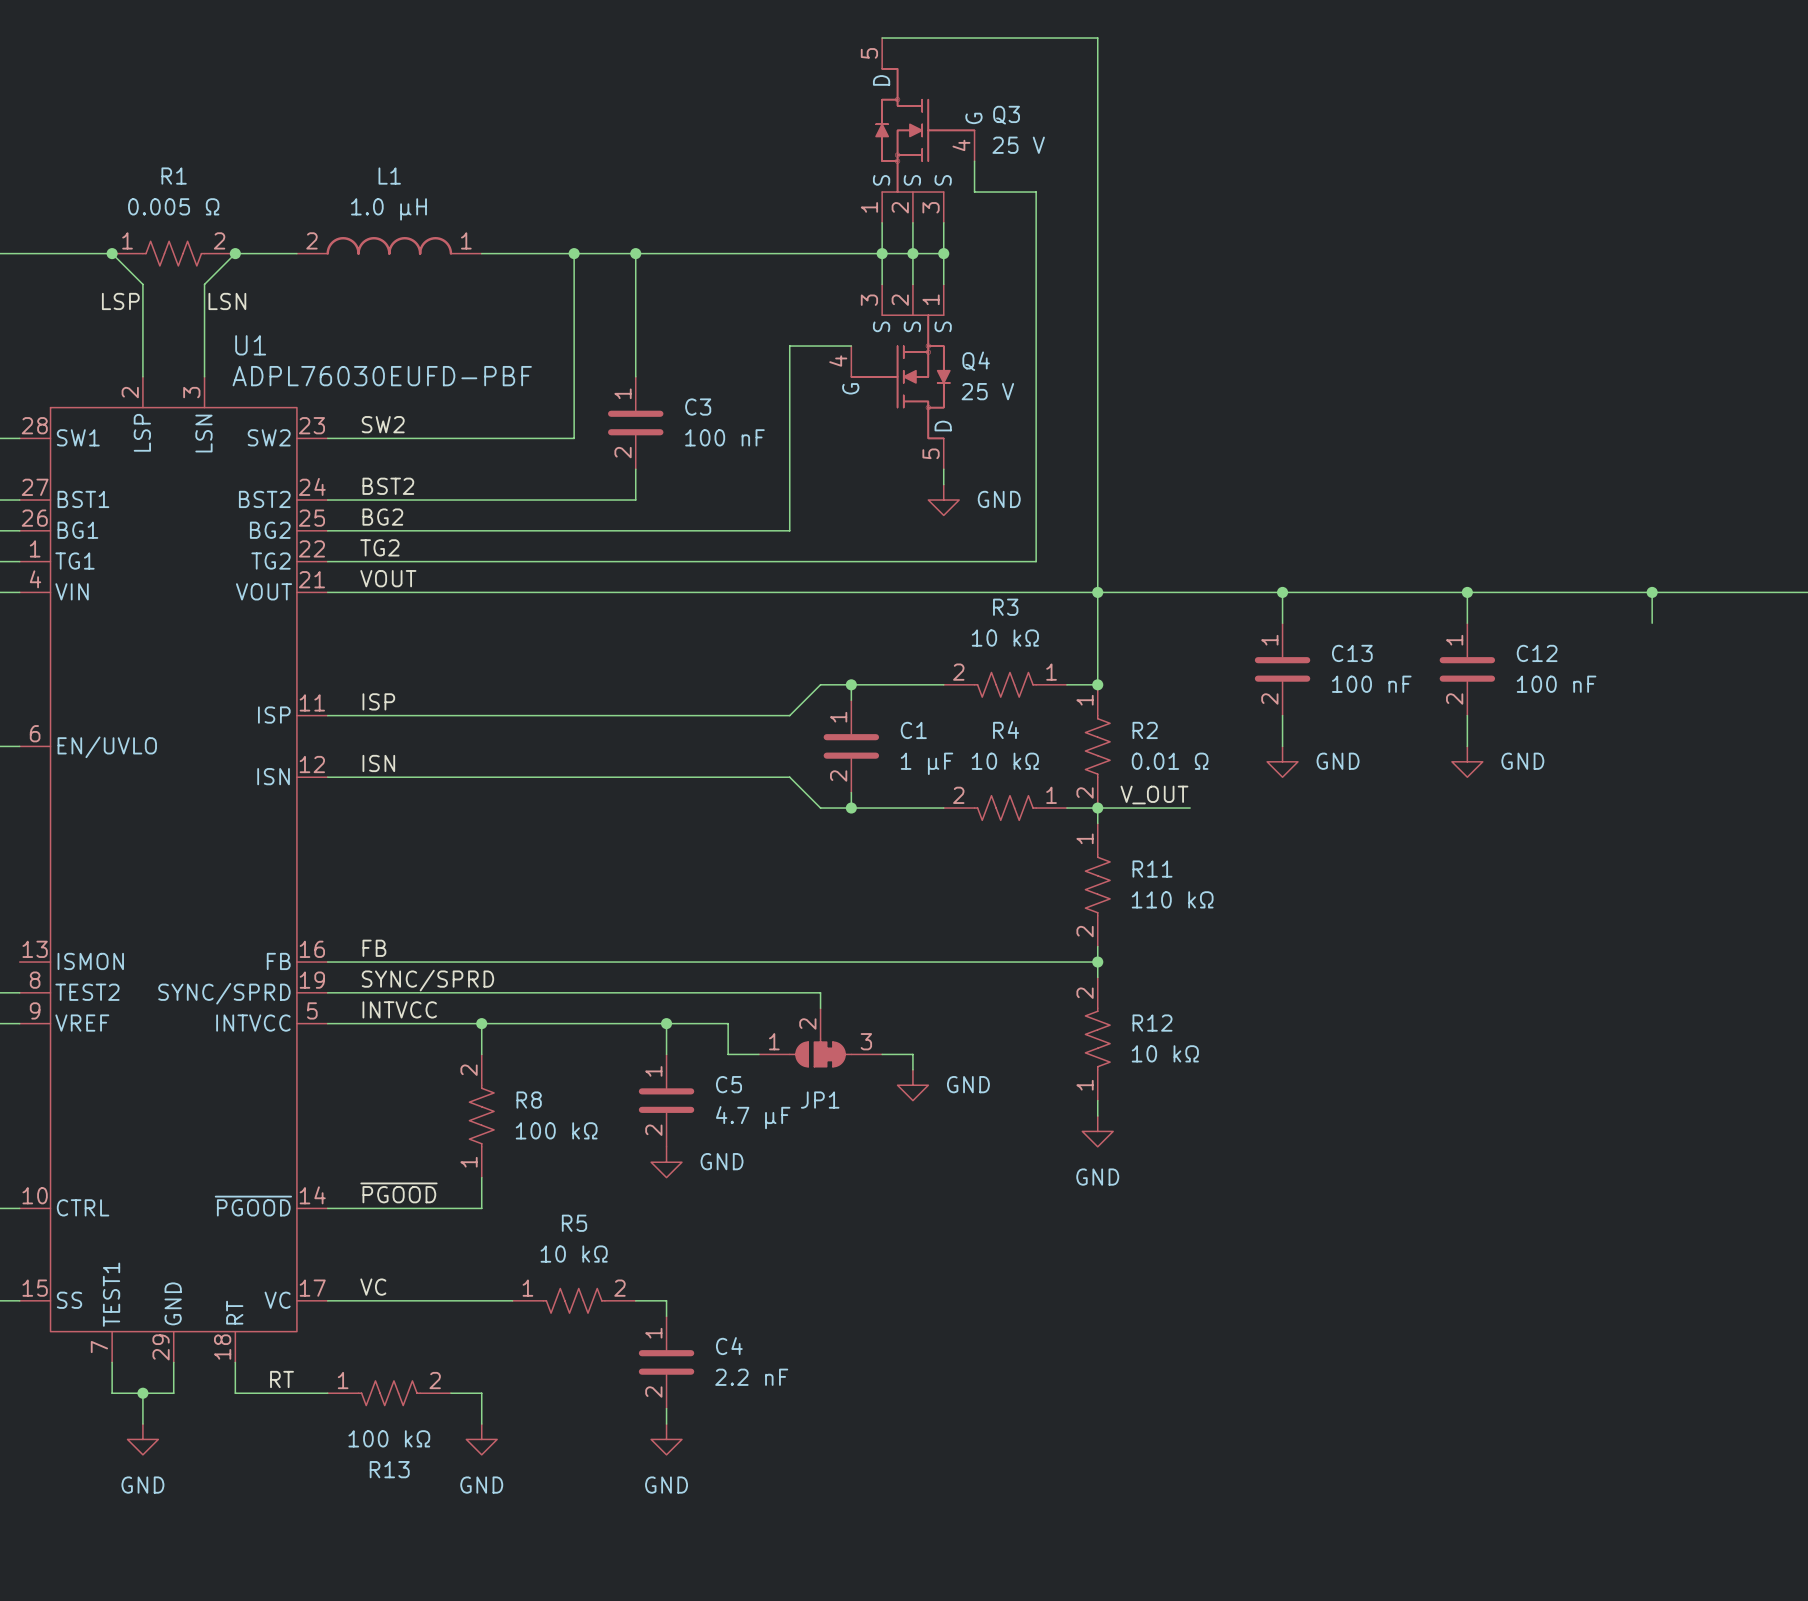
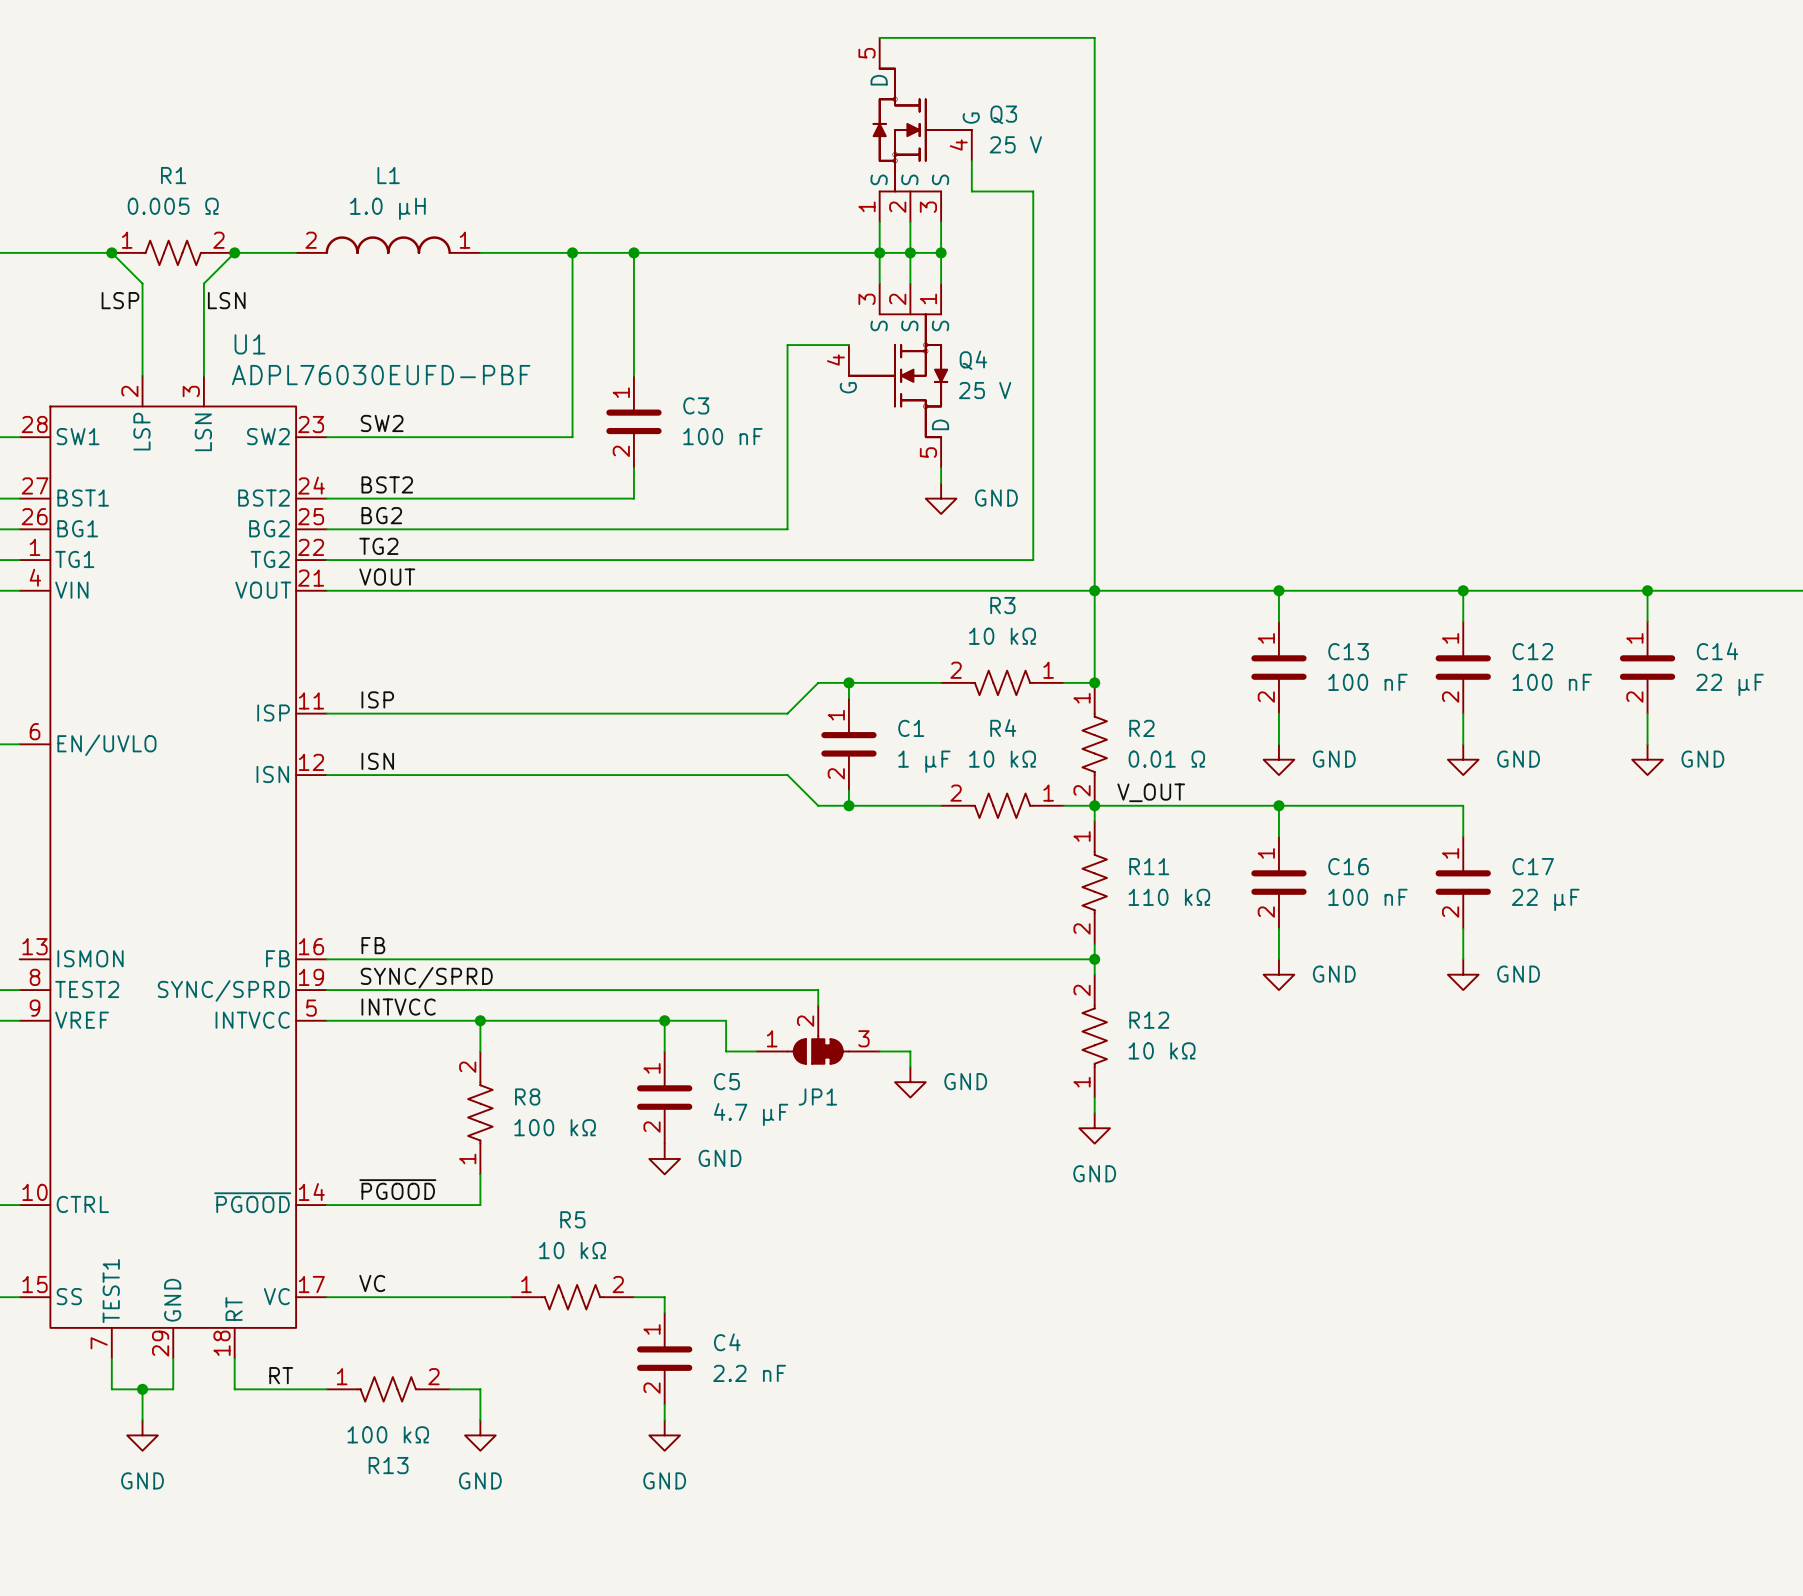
C14: none -> 22 µF (1647, 667)
wire: none -> (1647, 713) (1647, 744)
power symbol: none -> GND (1647, 759)
wire: none -> (1186, 805) (1463, 805) (1463, 836)
wire: none -> (1278, 805) (1278, 836)
junction: none -> (1278, 805)
C16: none -> 100 nF (1278, 882)
C17: none -> 22 µF (1463, 882)
wire: none -> (1278, 928) (1278, 959)
wire: none -> (1463, 928) (1463, 959)
power symbol: none -> GND (1278, 974)
power symbol: none -> GND (1463, 974)

